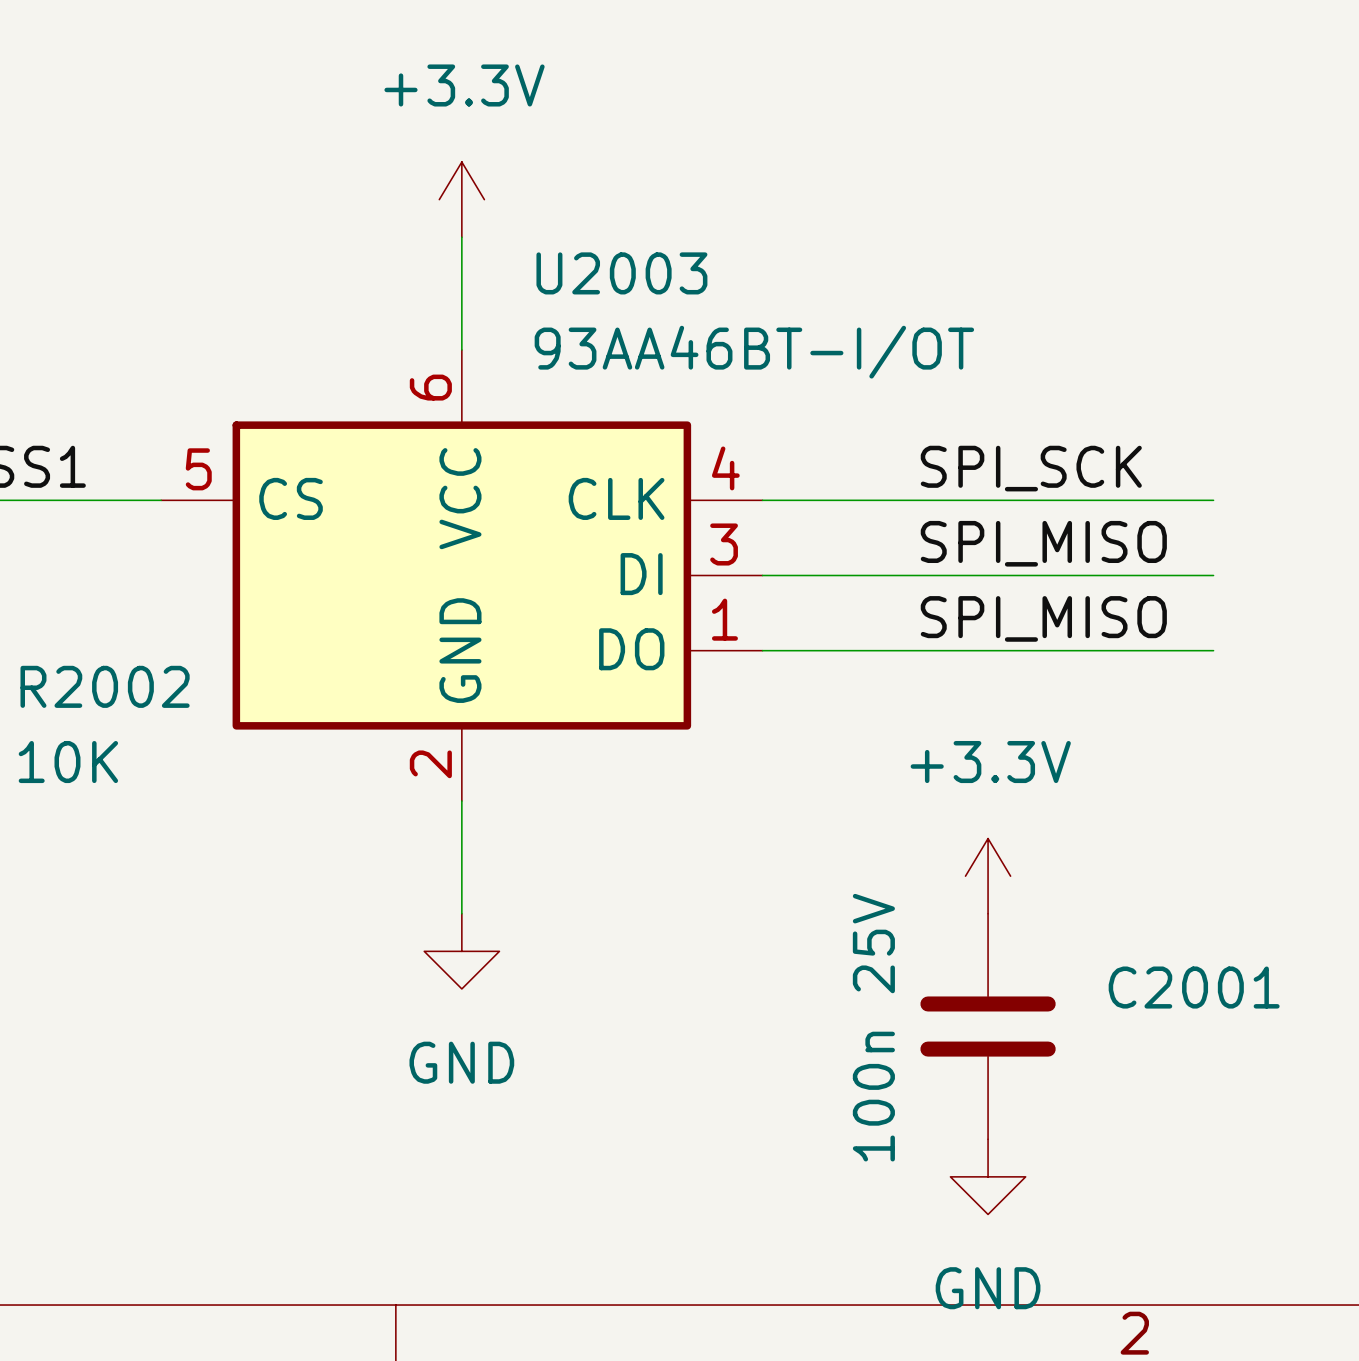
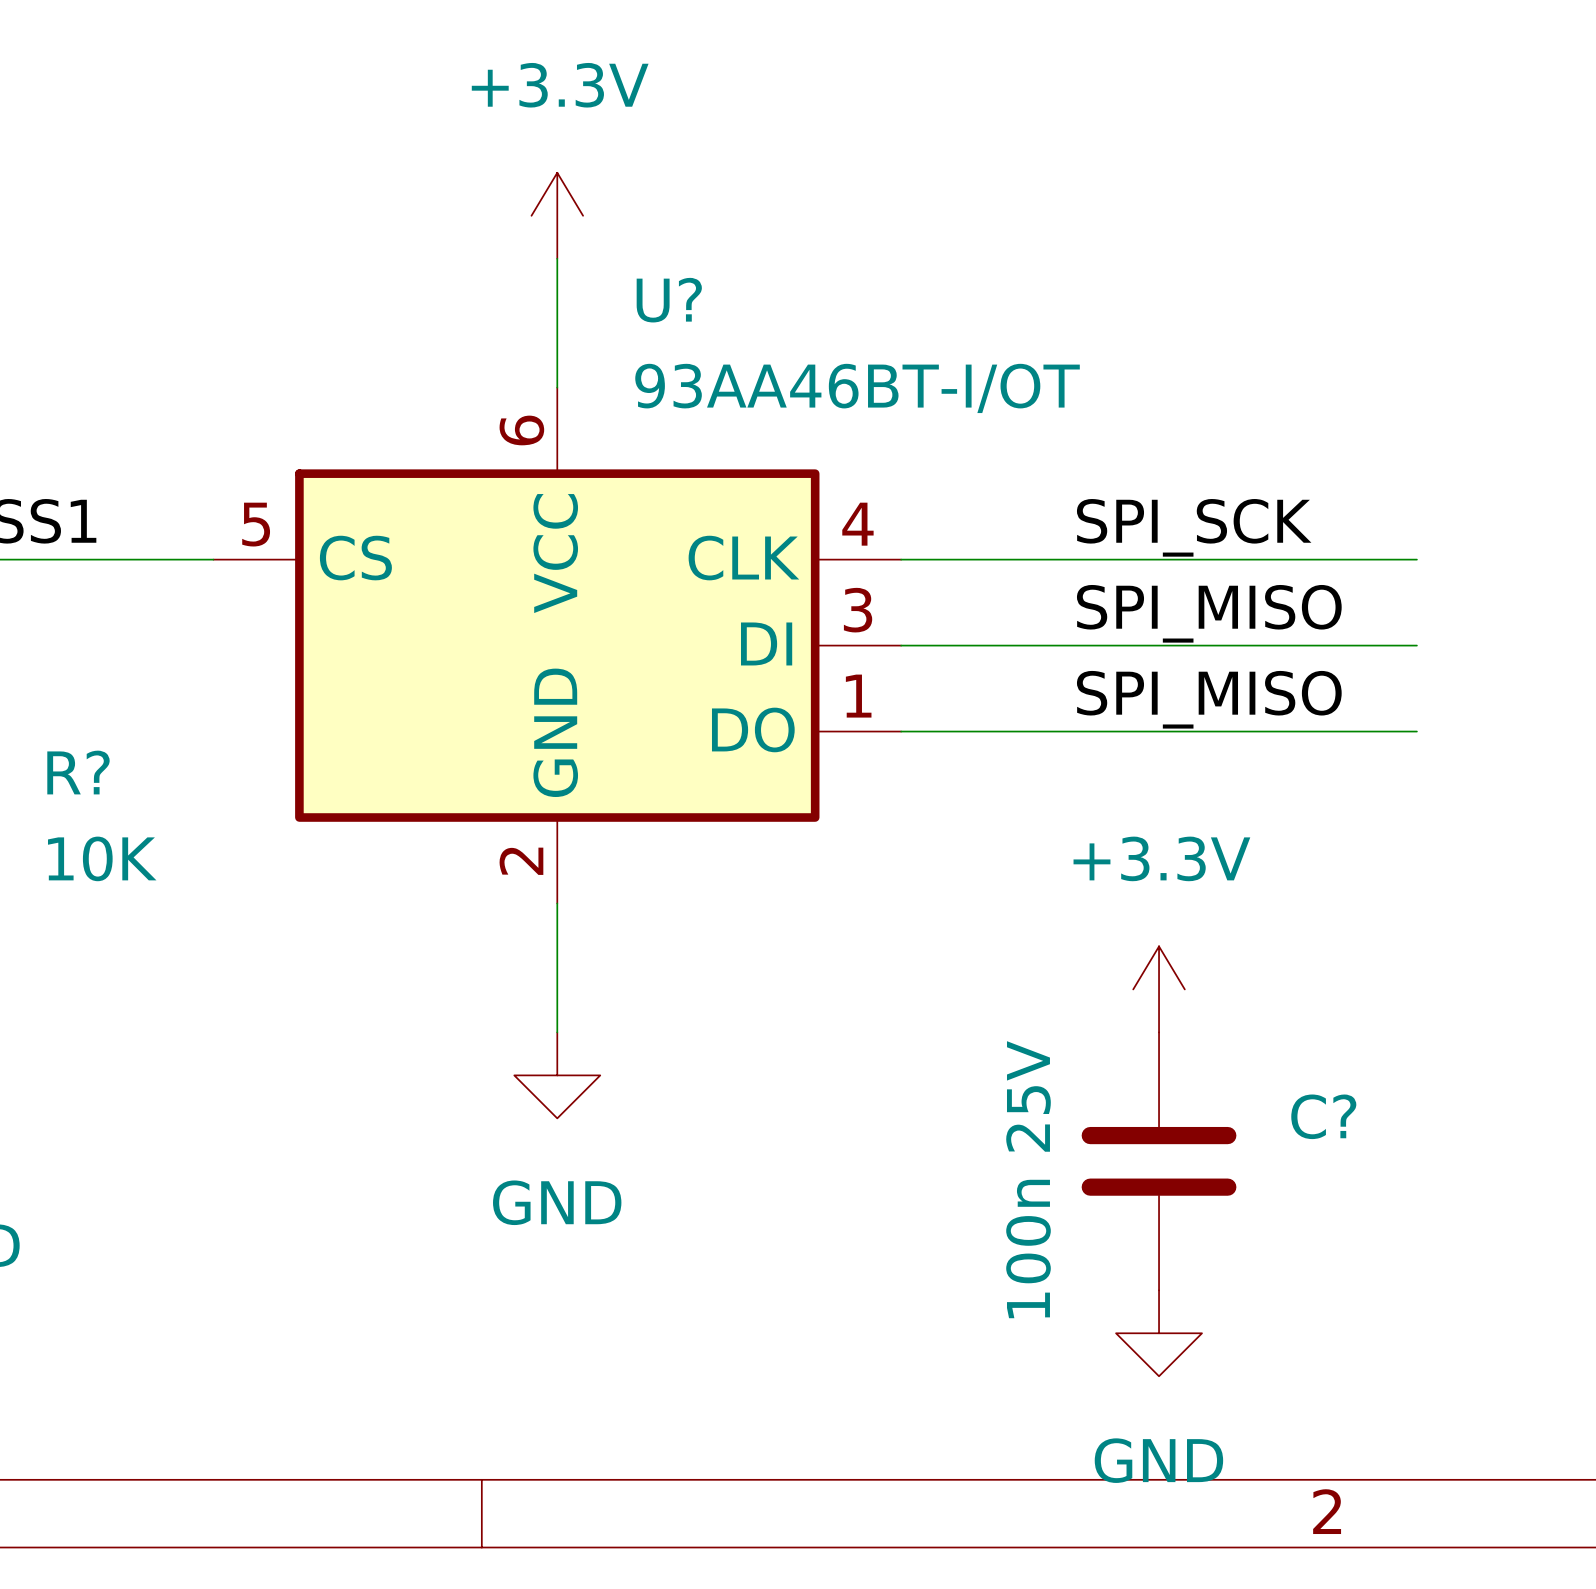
U2003 name: U2003 (621, 273) -> U? (669, 300)
R2002 name: R2002 (105, 686) -> R? (78, 772)
C2001 name: C2001 (1194, 987) -> C? (1323, 1116)

